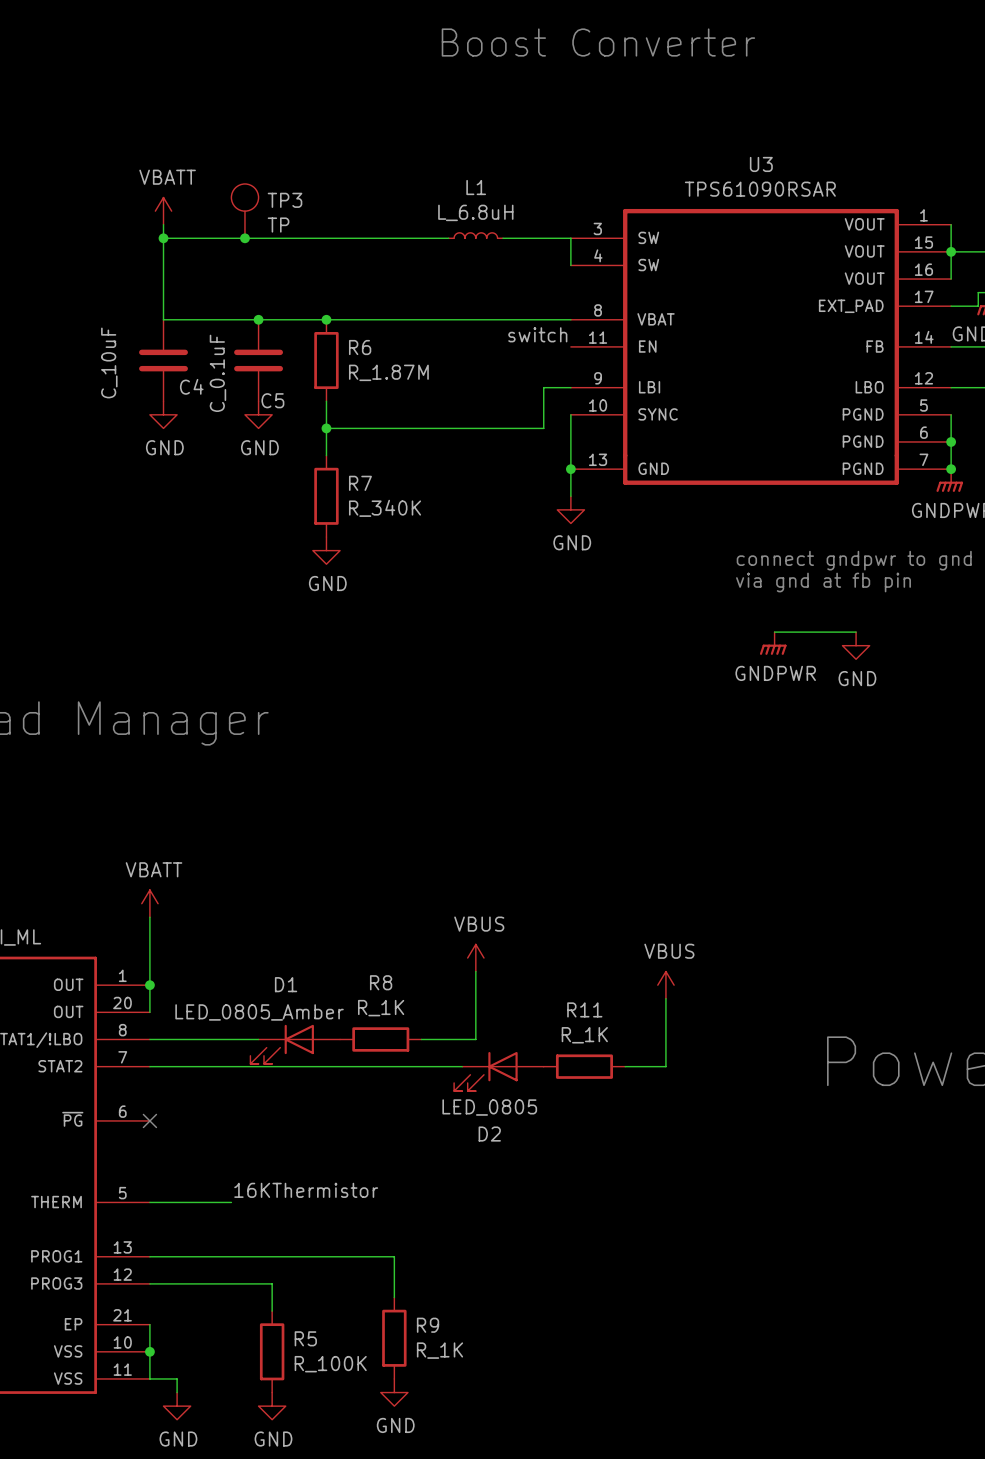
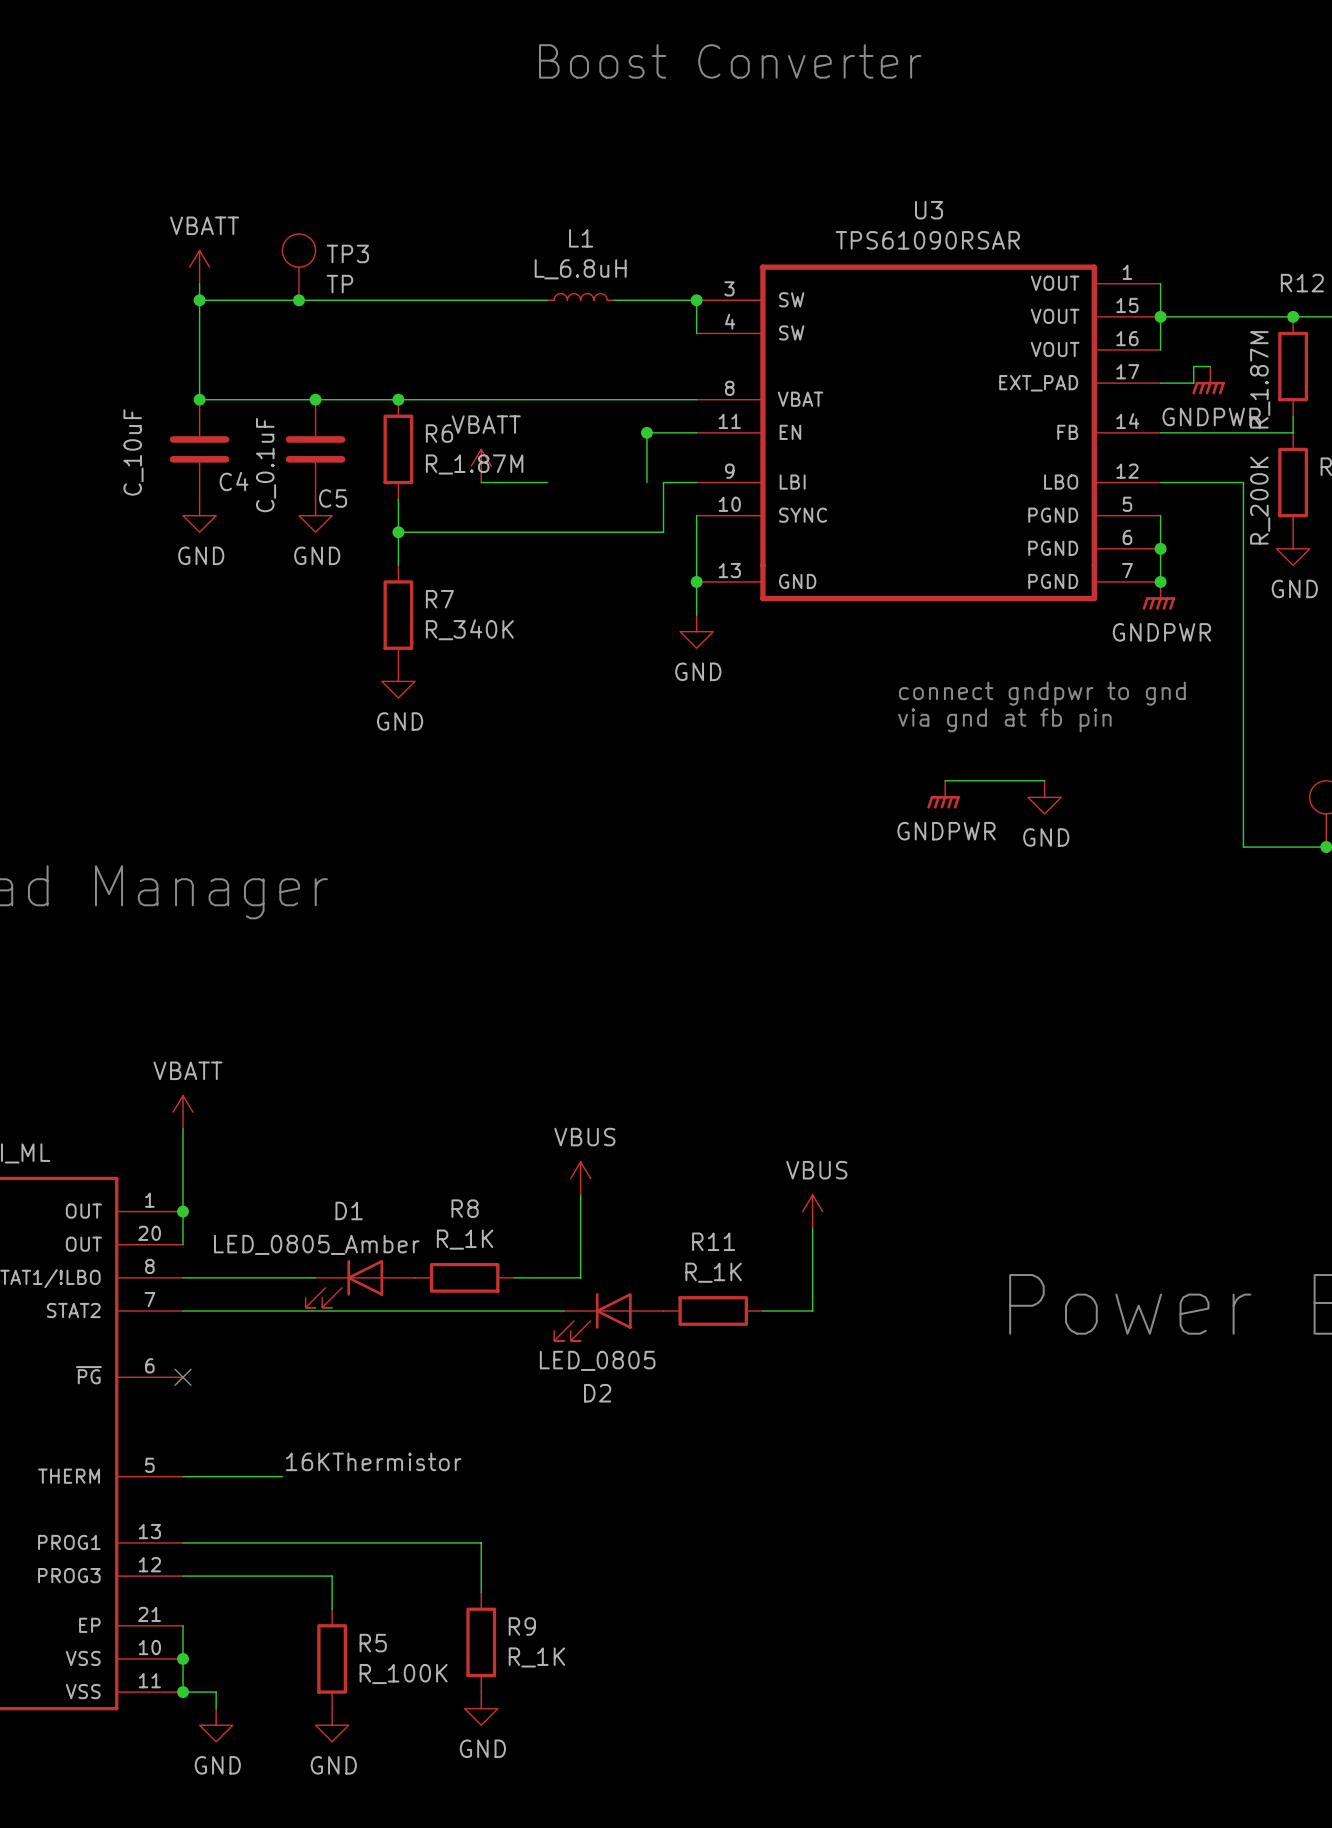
junction: none -> (696, 300)
junction: none -> (199, 399)
label: switch (537, 334) -> none
junction: none -> (646, 432)
wire: none -> (696, 432) (646, 432) (646, 482)
power symbol: none -> VBATT (481, 465)
wire: none -> (481, 482) (547, 482)
junction: none -> (183, 1692)

